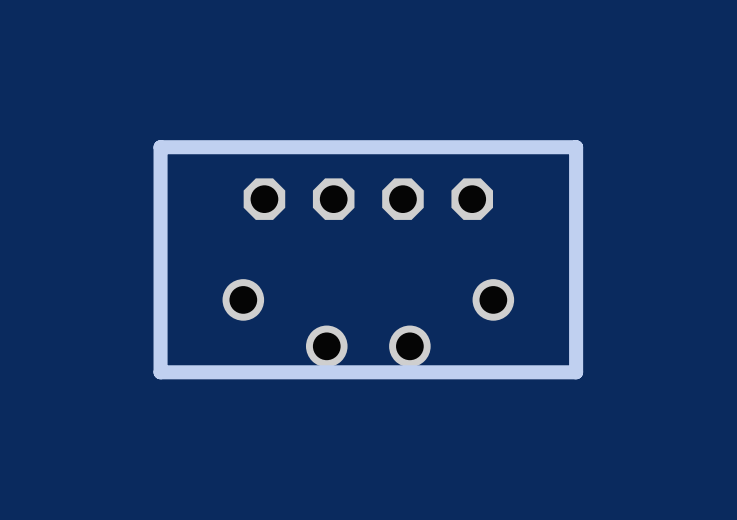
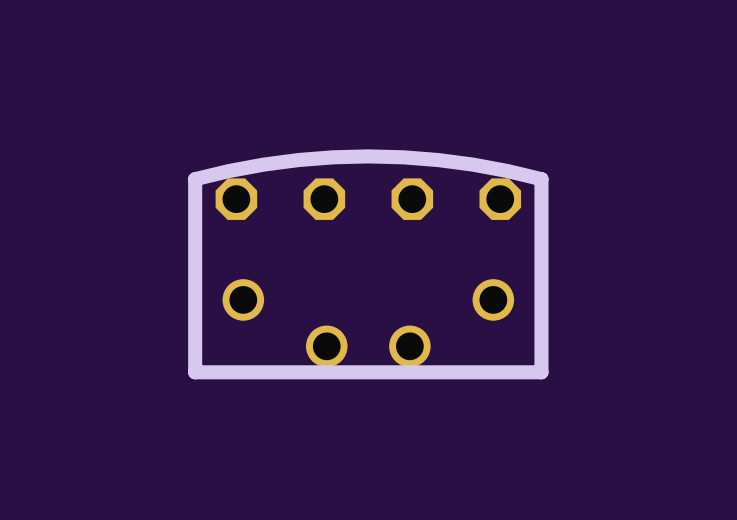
part footprint: [243, 178, 493, 220] -> [215, 178, 522, 220]
board edge: (195, 372) (160, 372) (160, 147) (576, 147) (576, 372) (541, 372) -> (195, 372) (195, 179) (263, 164) (333, 157) (368, 156) (403, 157) (472, 164) (541, 179) (541, 372)

